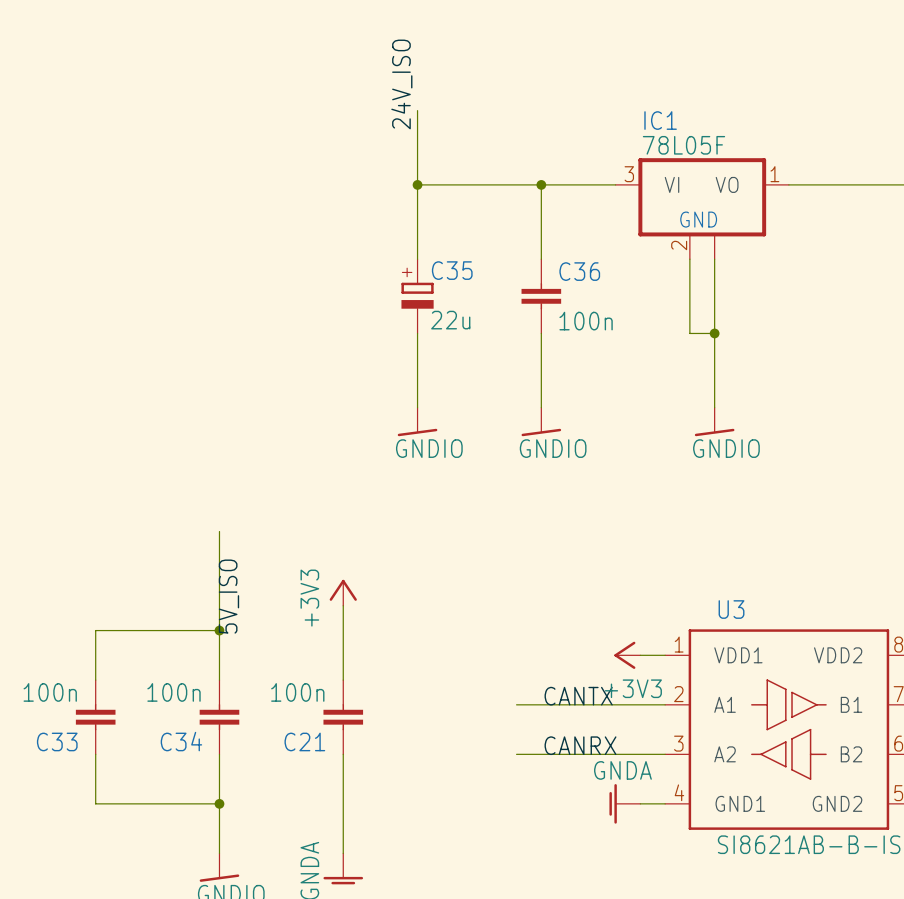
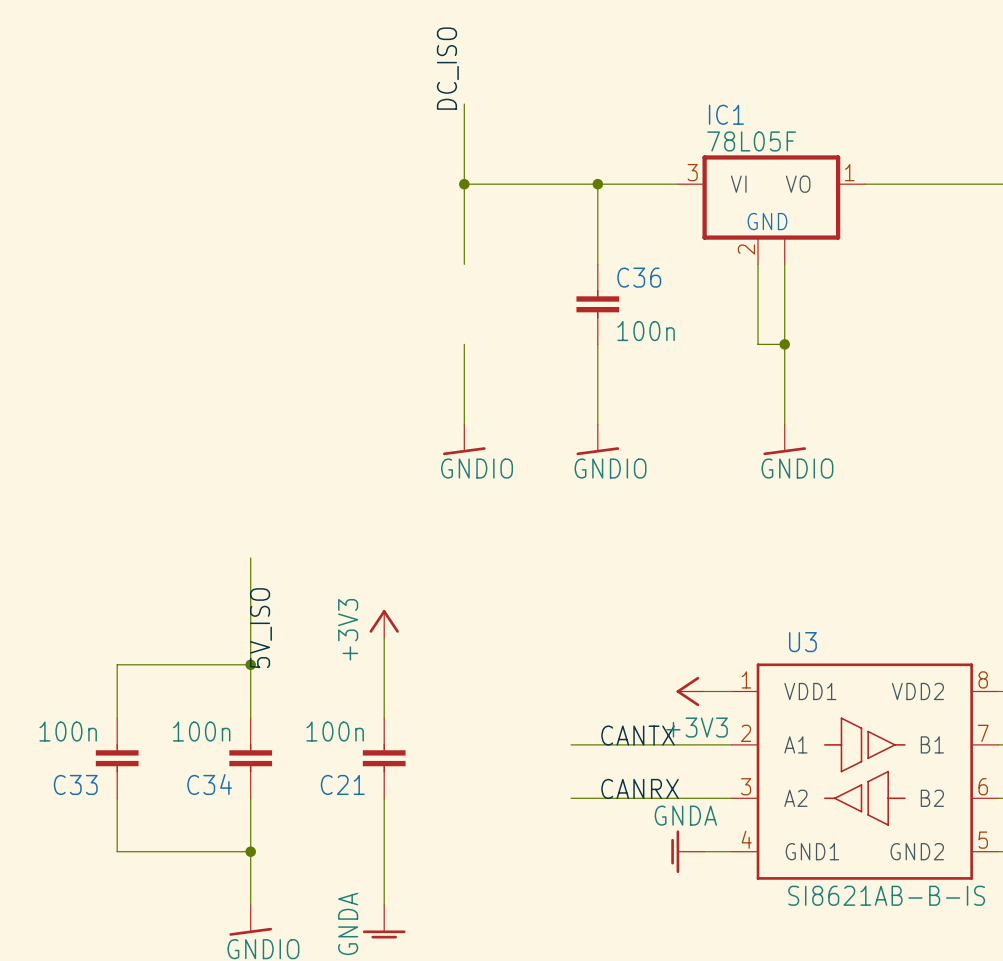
label: 24V_ISO (401, 84) -> DC_ISO (447, 68)
C35: 22u (417, 296) -> none

